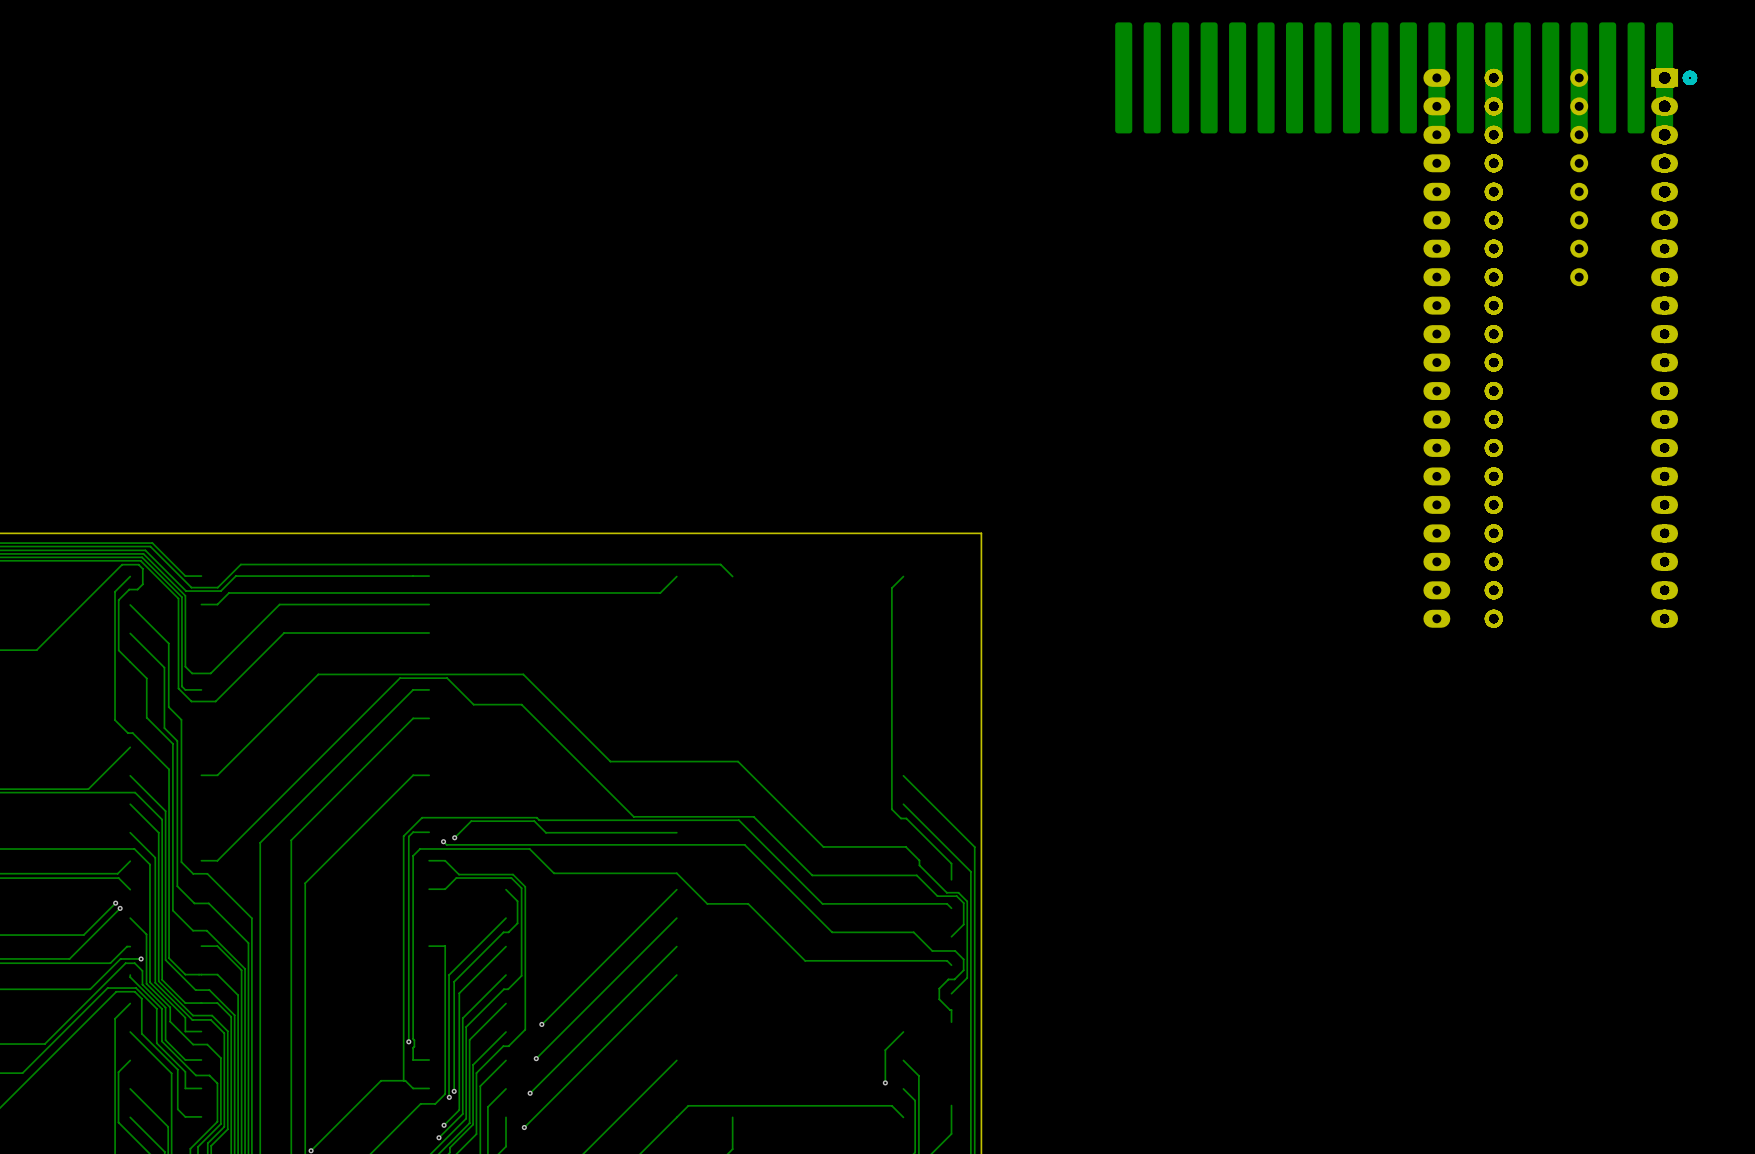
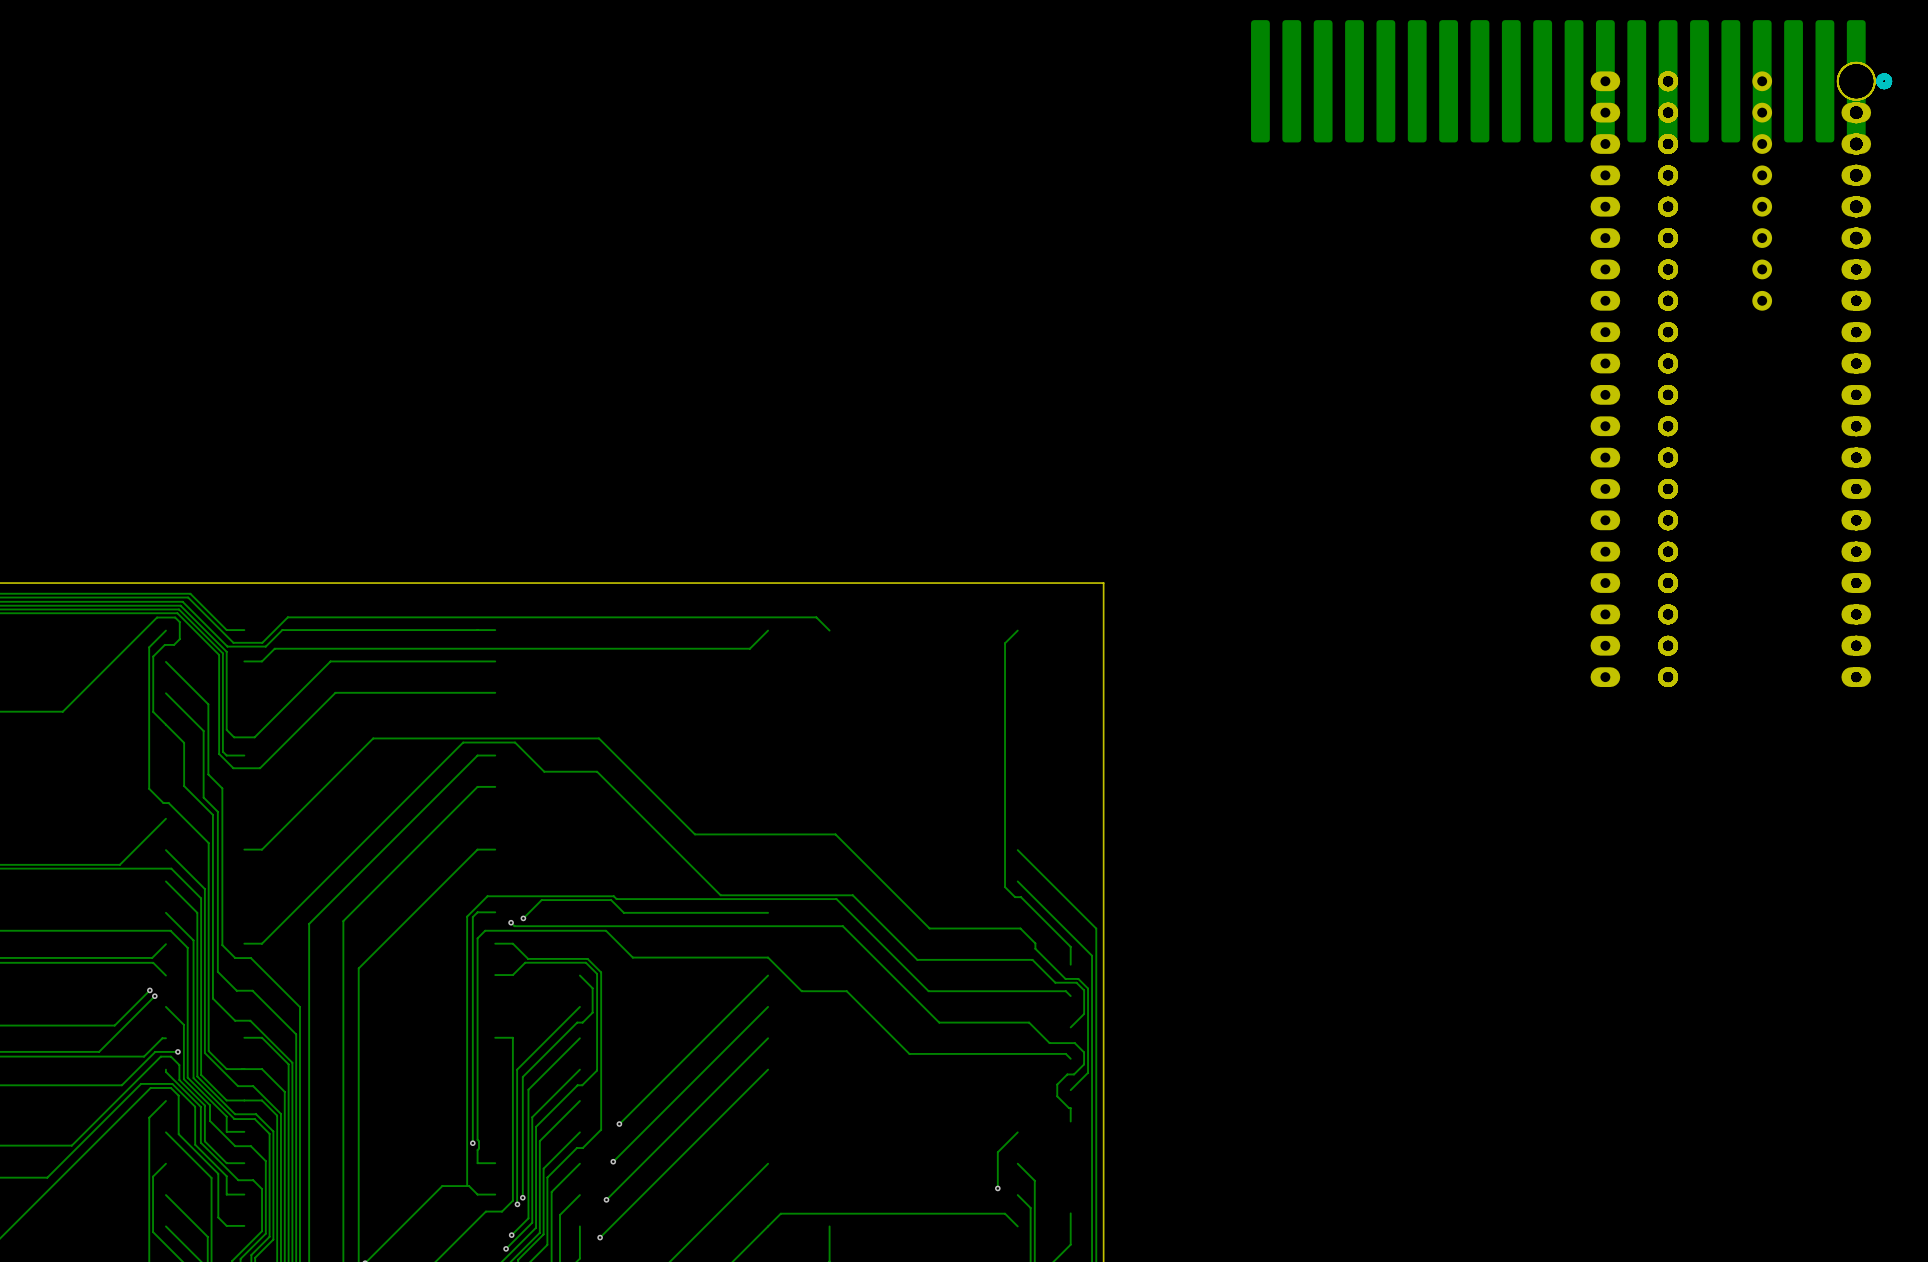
part: none -> (1856, 81)

